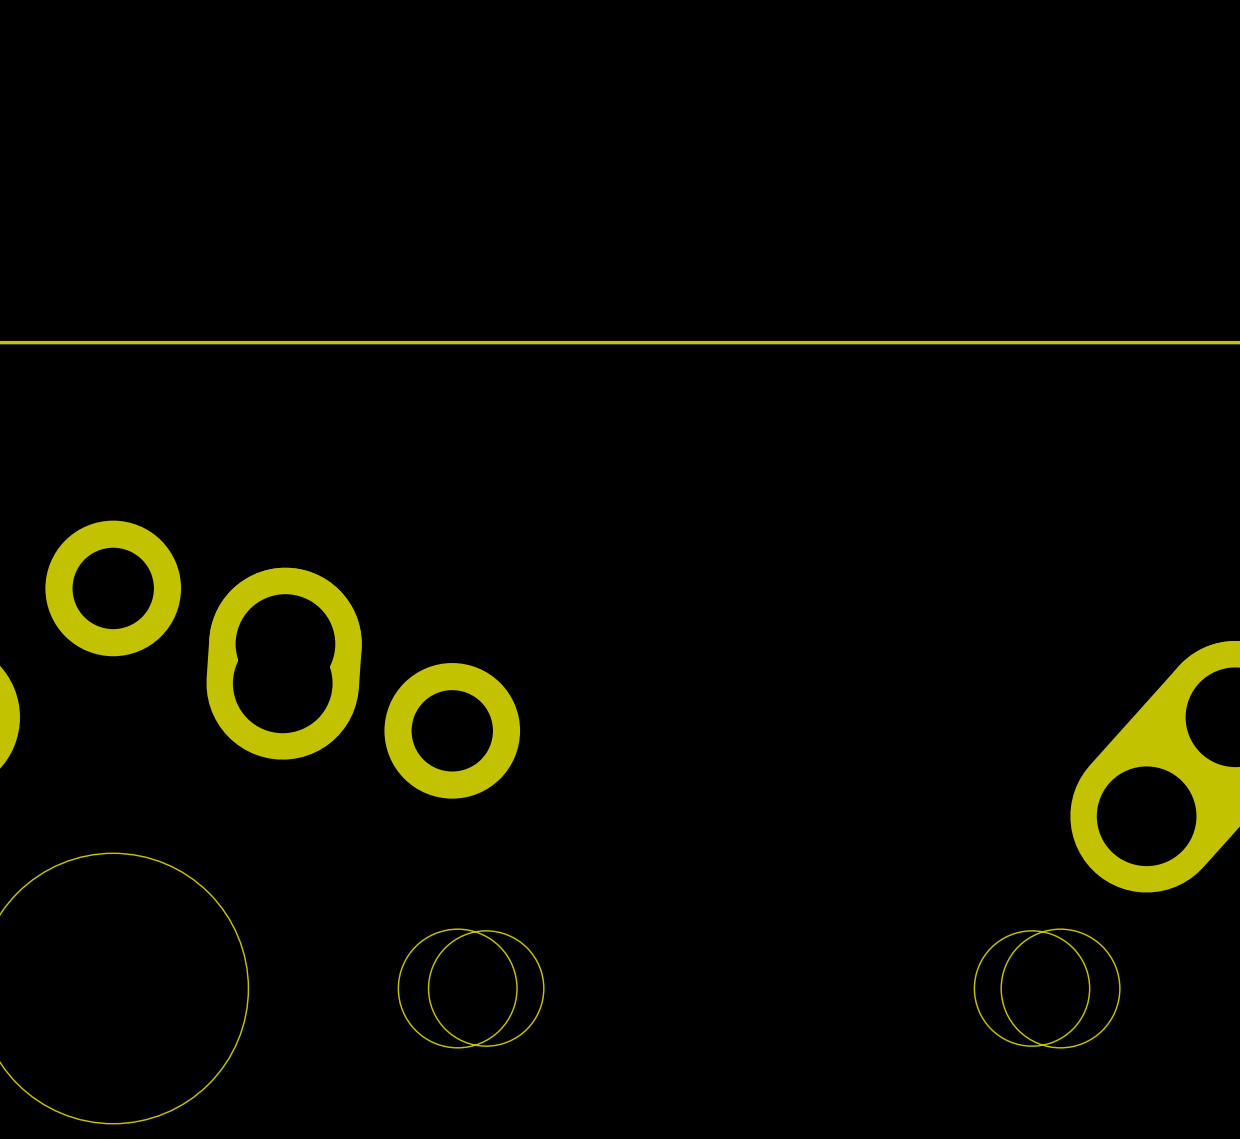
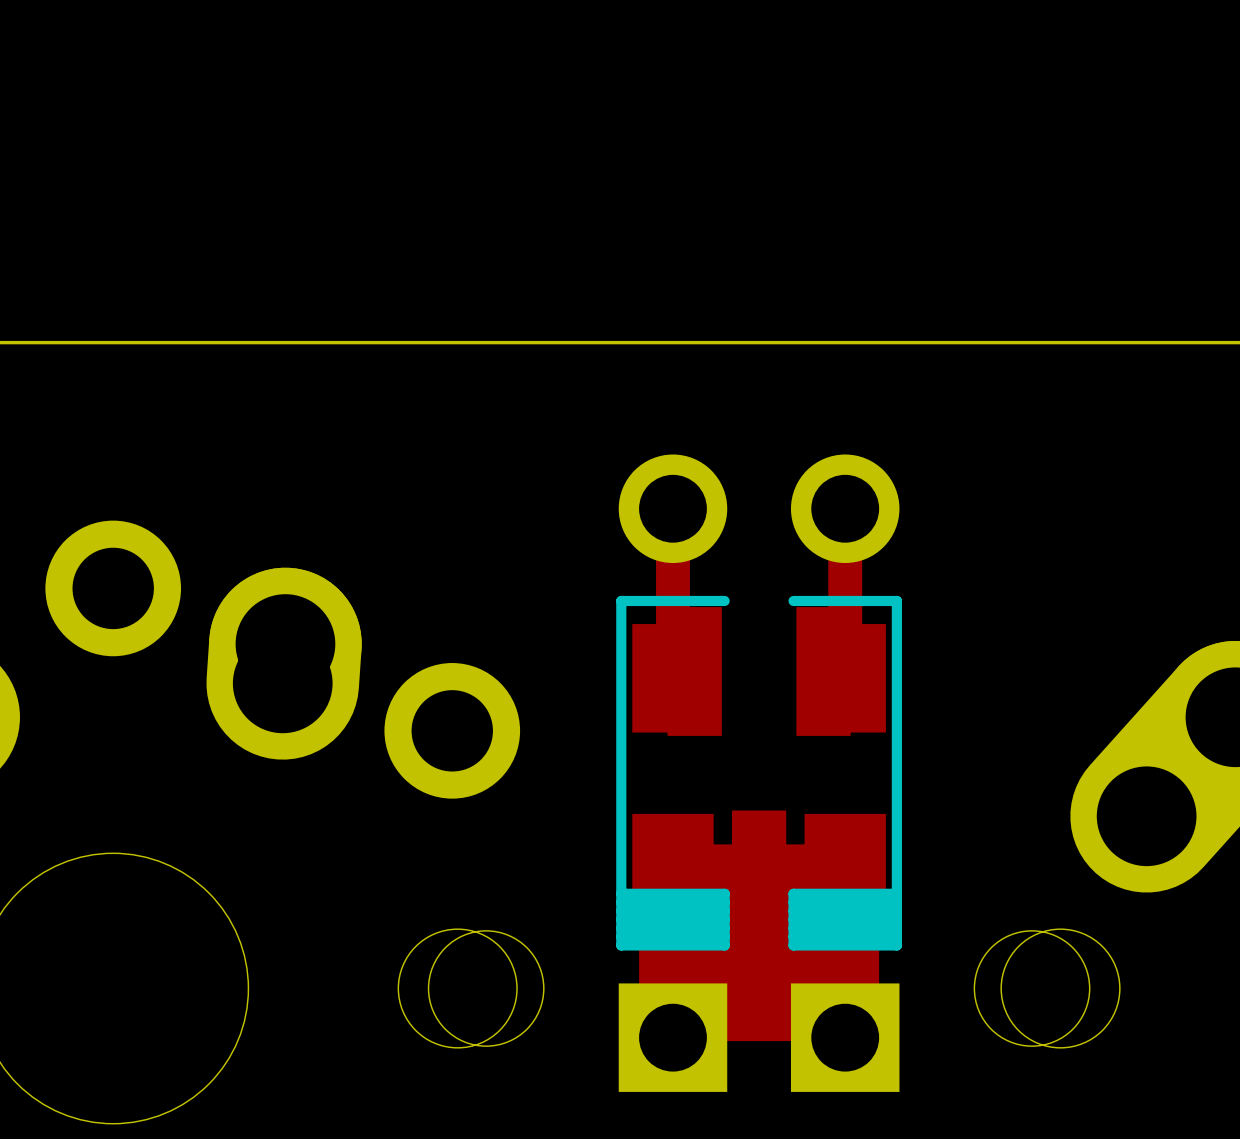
part: none -> (759, 773)

